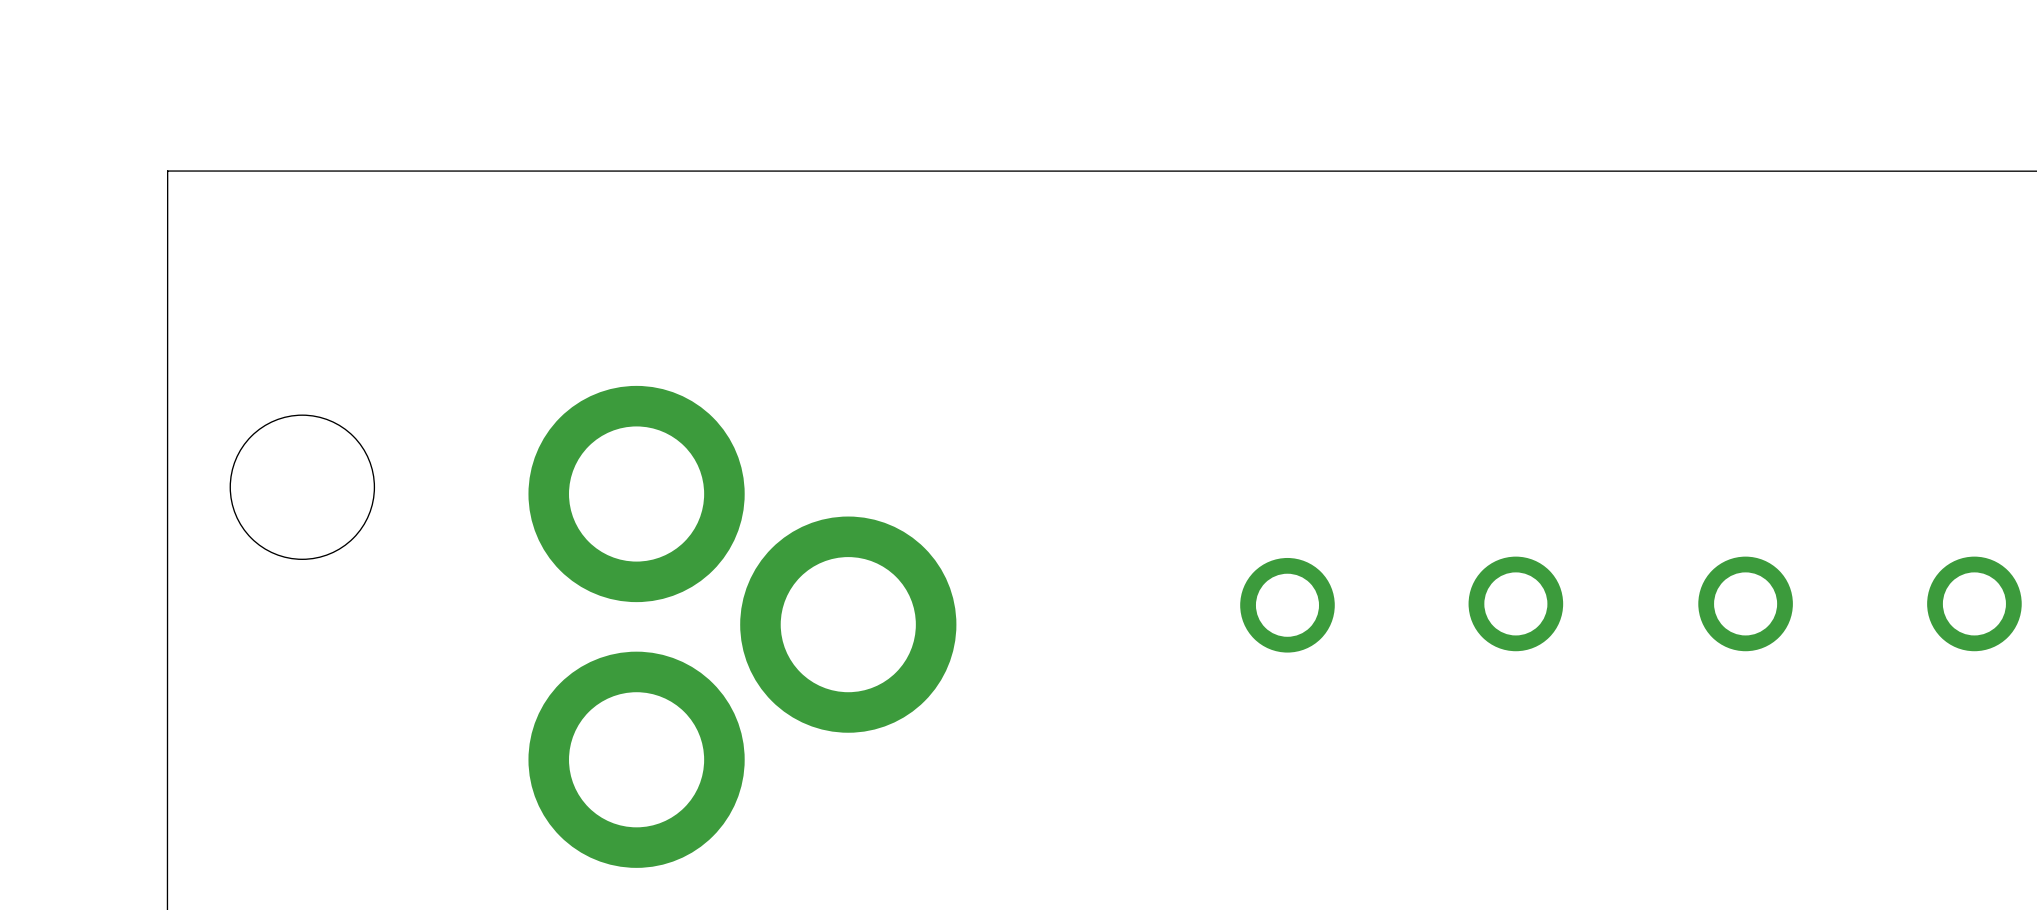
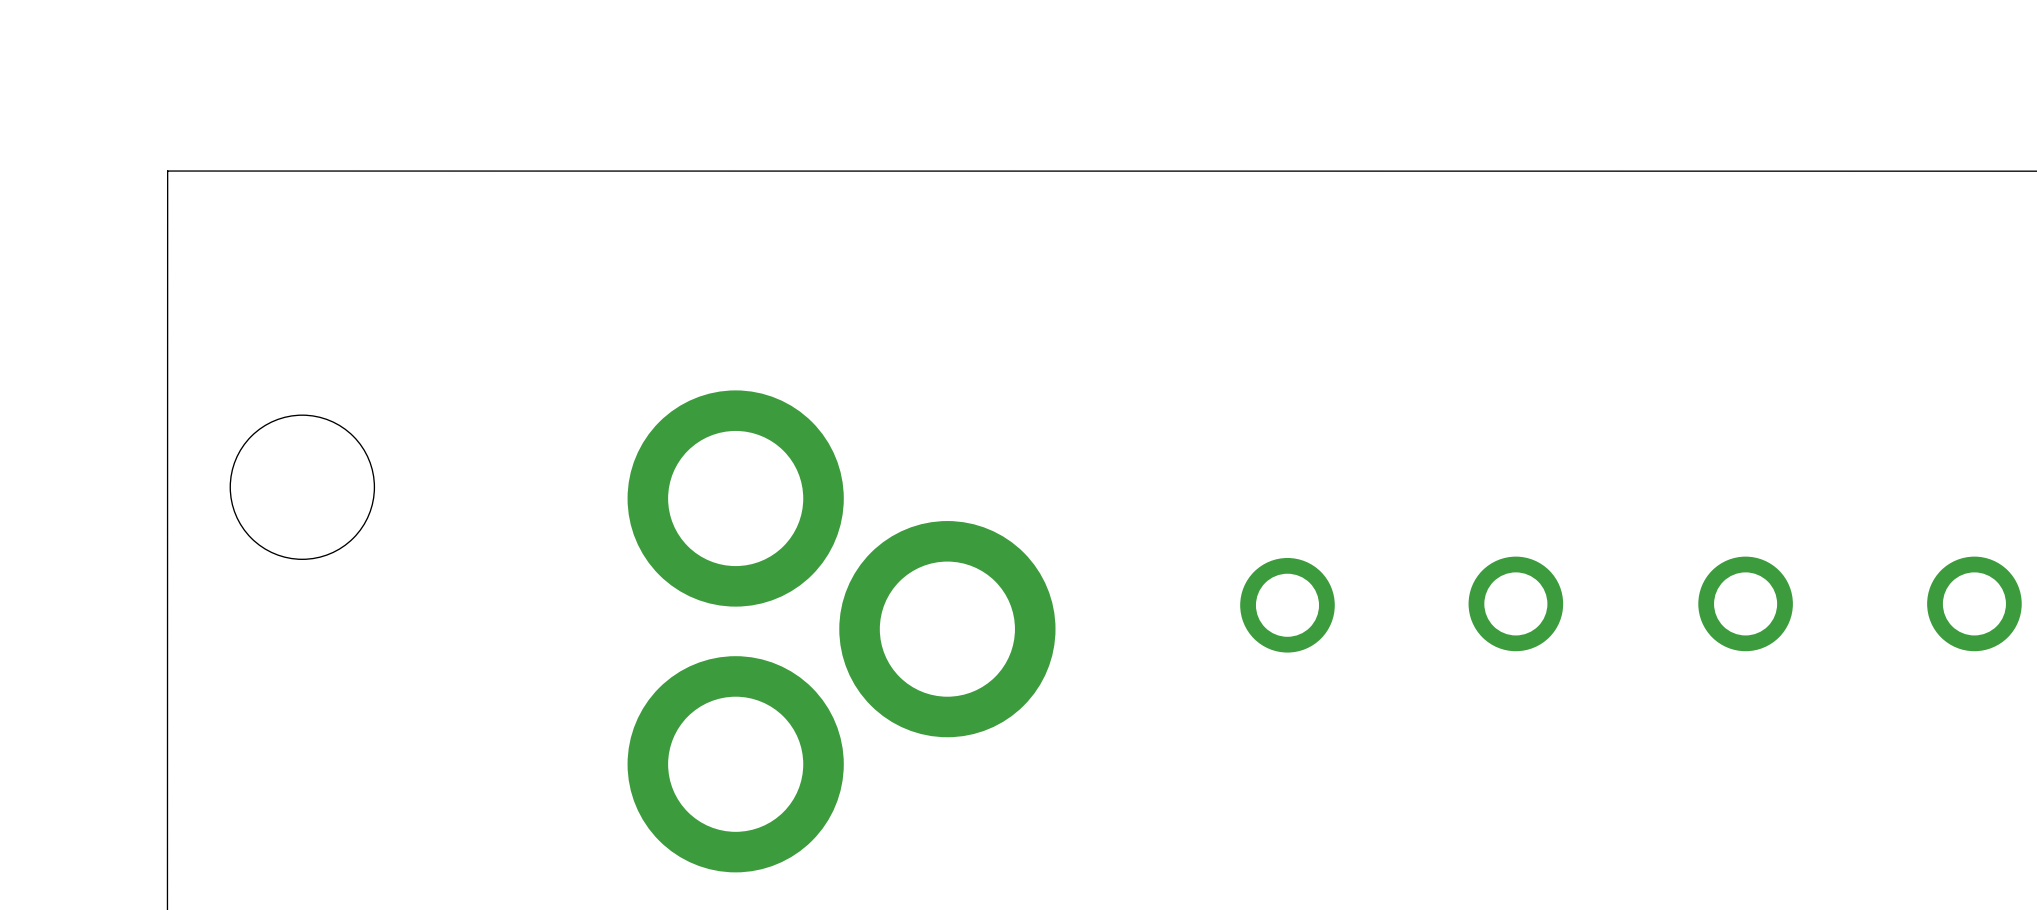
part position: (742, 626) -> (841, 631)

